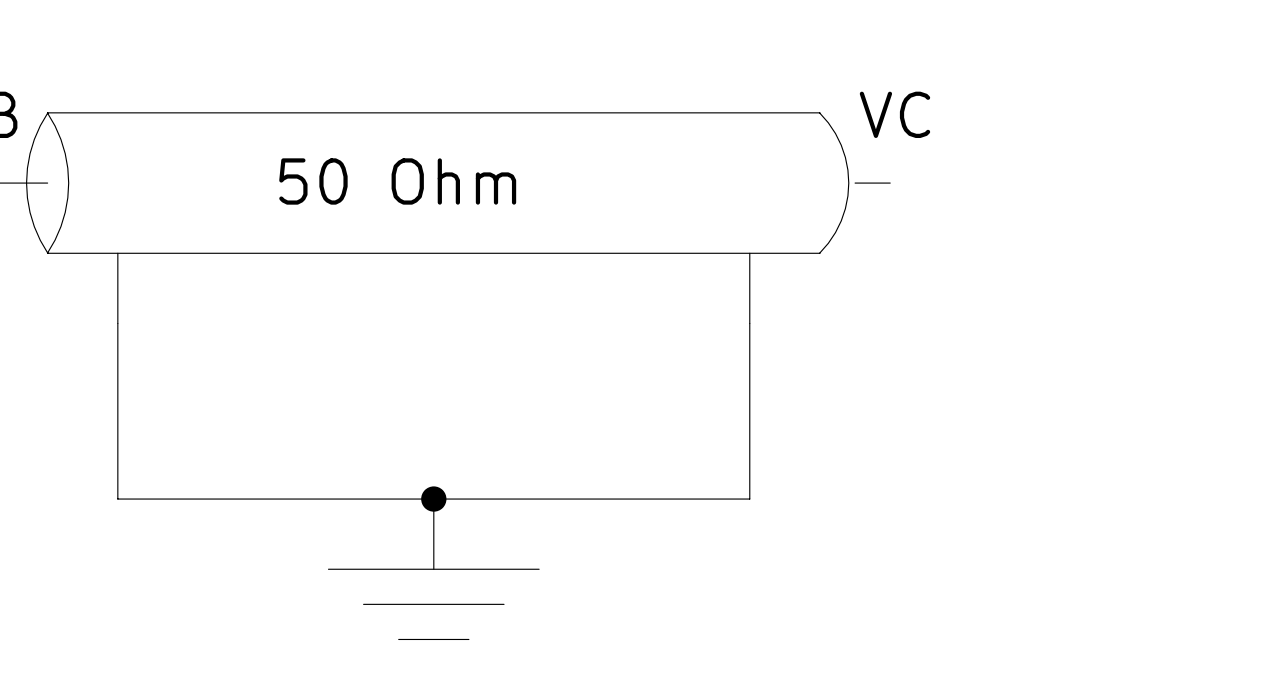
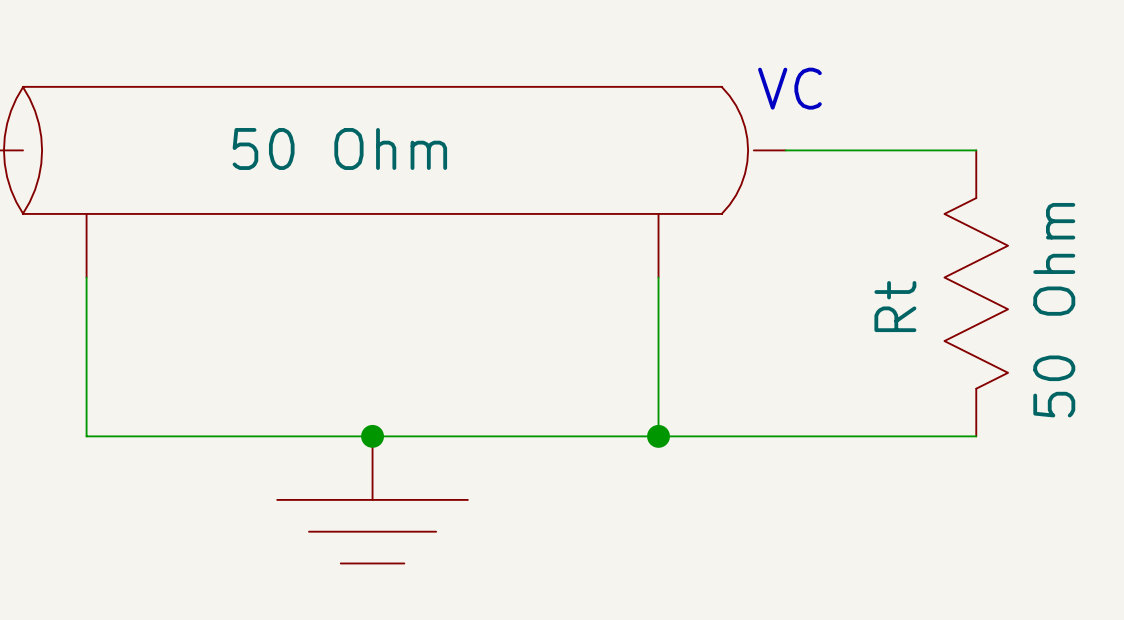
wire: none -> (785, 150) (976, 150)
50 Ohm: none -> Rt (976, 293)
wire: none -> (658, 436) (976, 436)
junction: none -> (658, 436)

